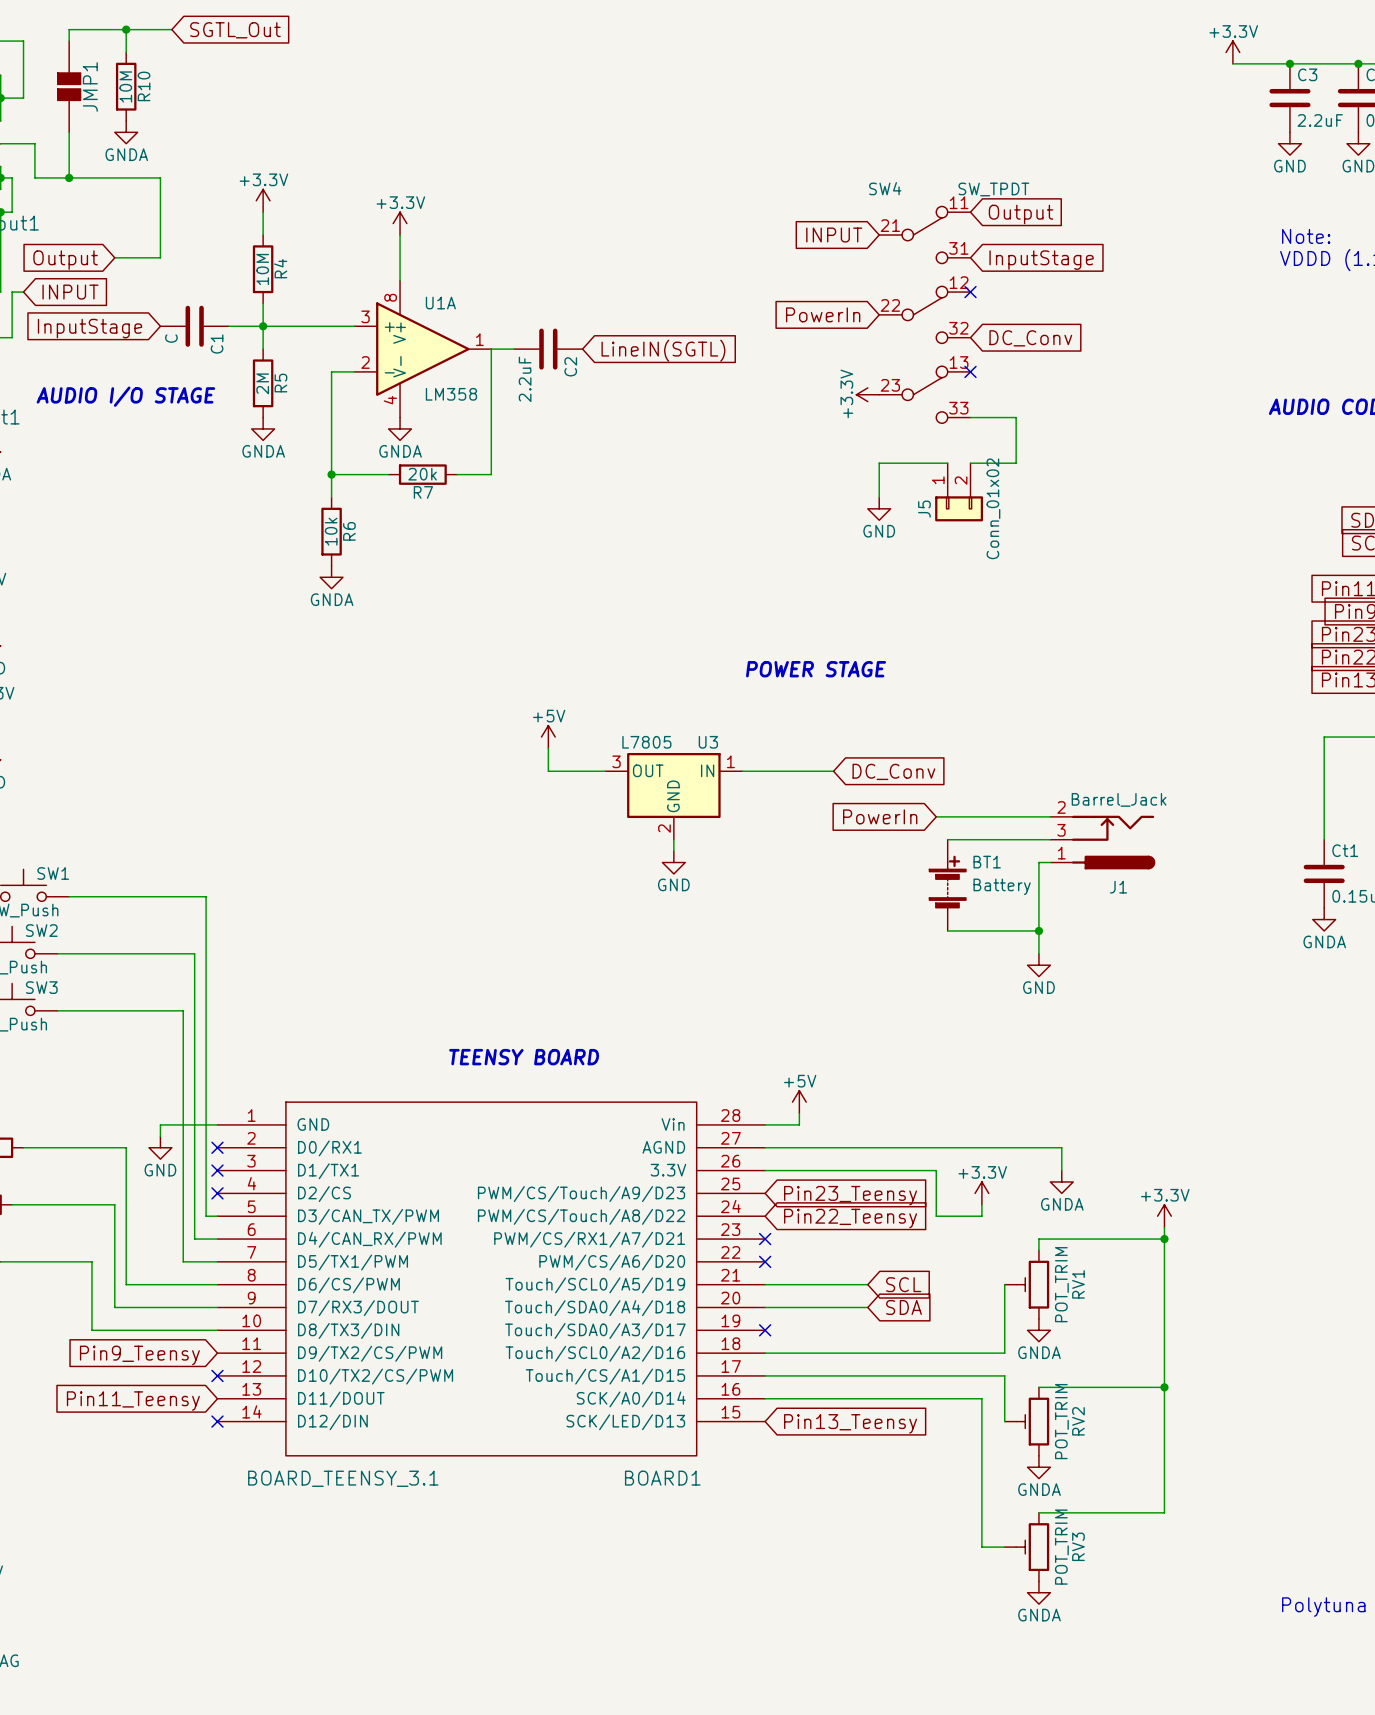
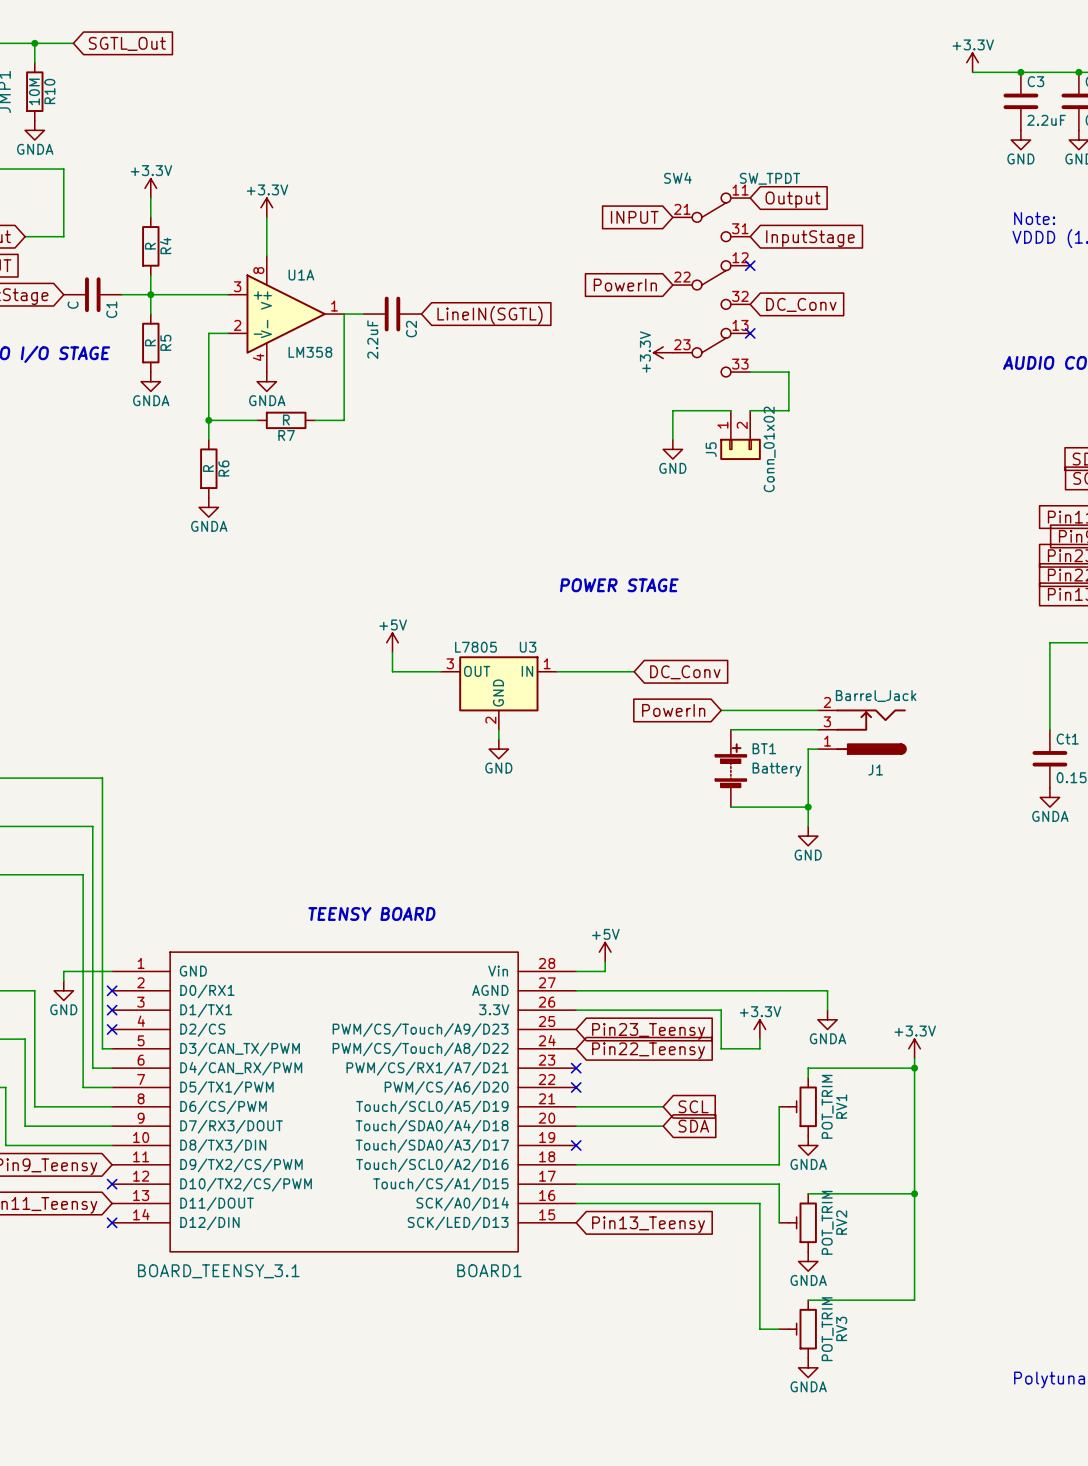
R4 value: 10M (262, 269) -> R (150, 246)
R5 value: 2M (262, 383) -> R (150, 342)
R7 value: 20k (422, 474) -> R (286, 420)
R6 value: 10k (331, 531) -> R (208, 468)

